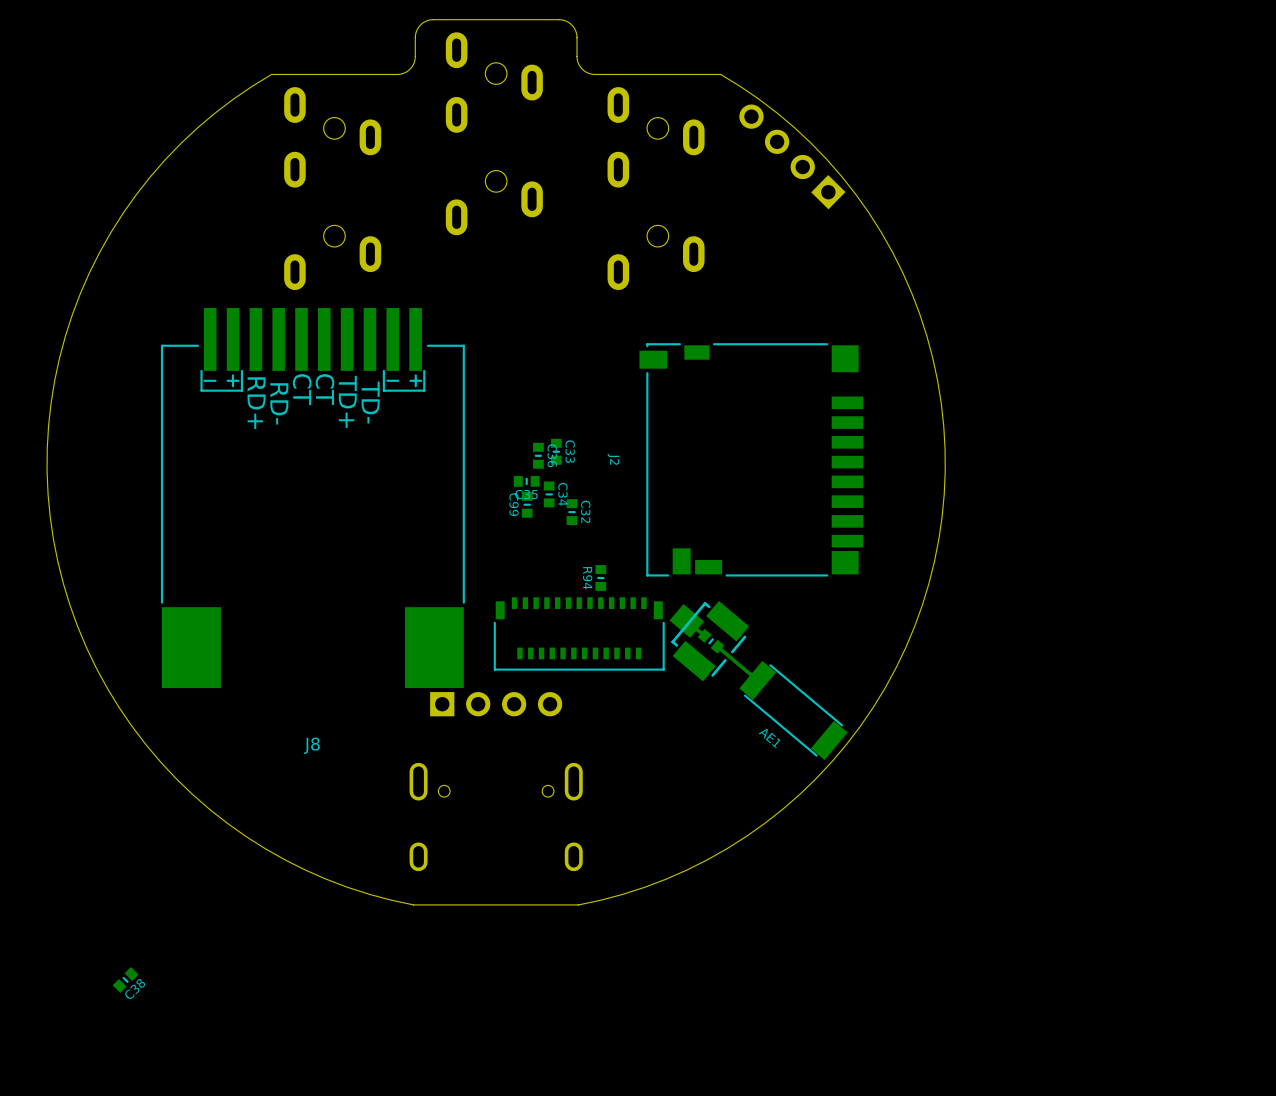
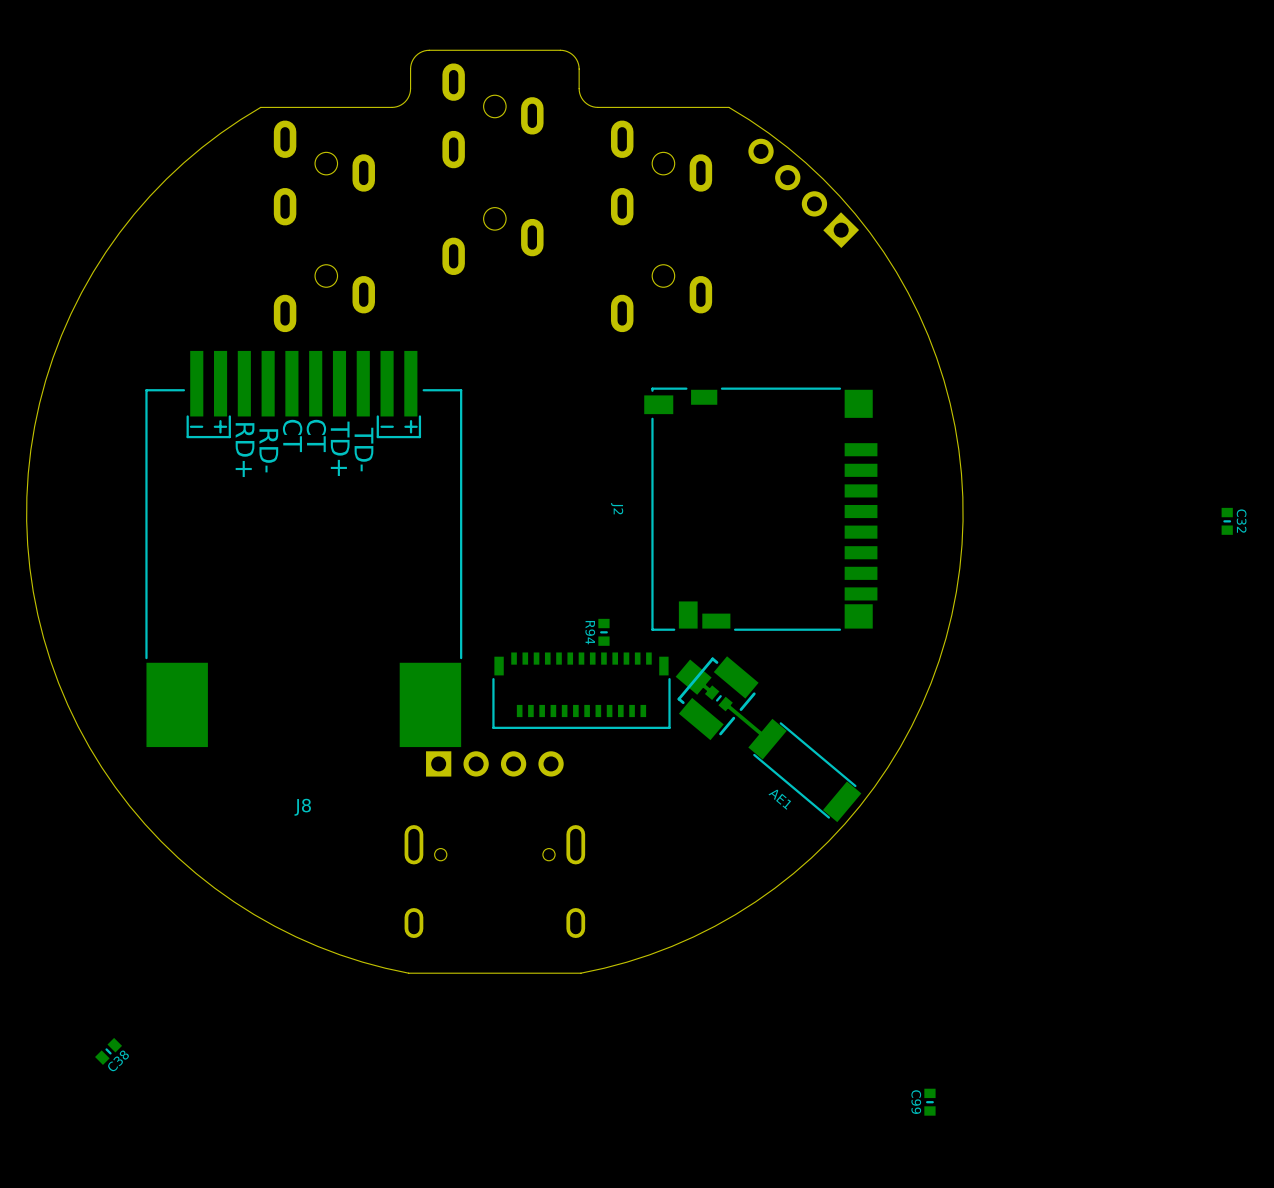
C33: (556, 451) -> none
C36: (538, 455) -> none
C35: (526, 481) -> none
C34: (549, 494) -> none
C99 position: (527, 504) -> (929, 1102)
C32 position: (571, 512) -> (1227, 521)

